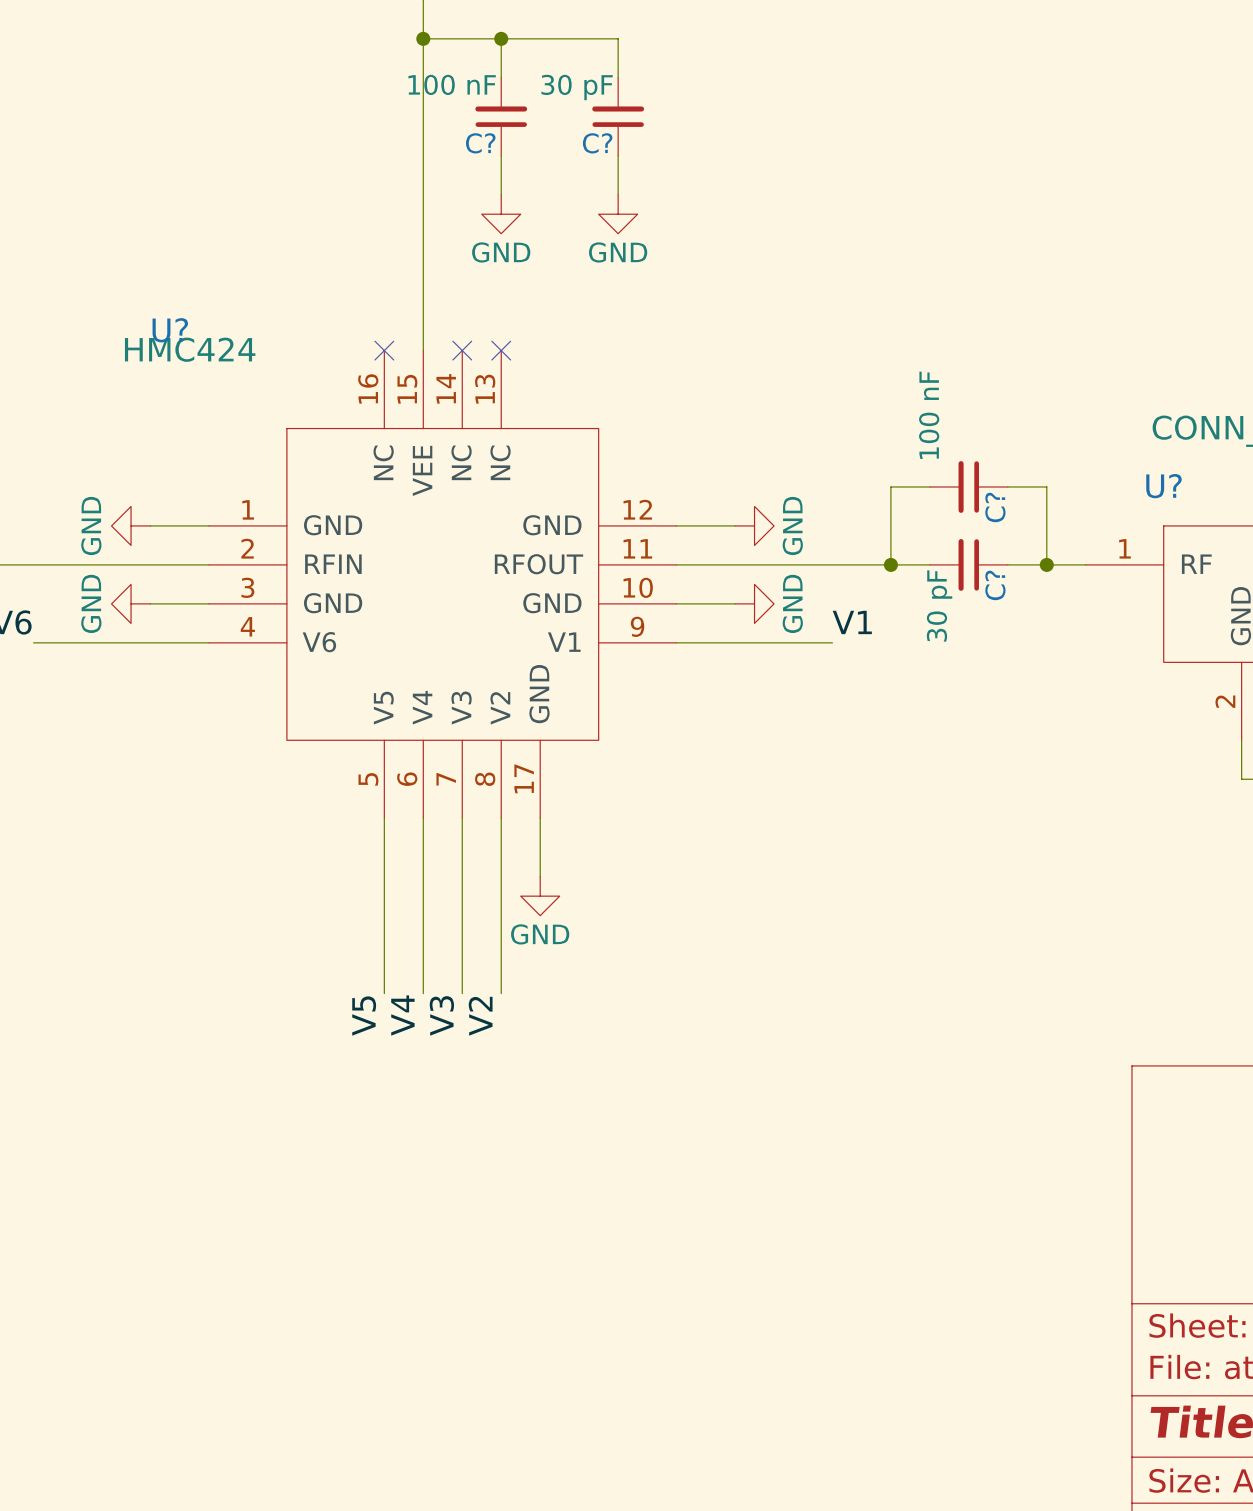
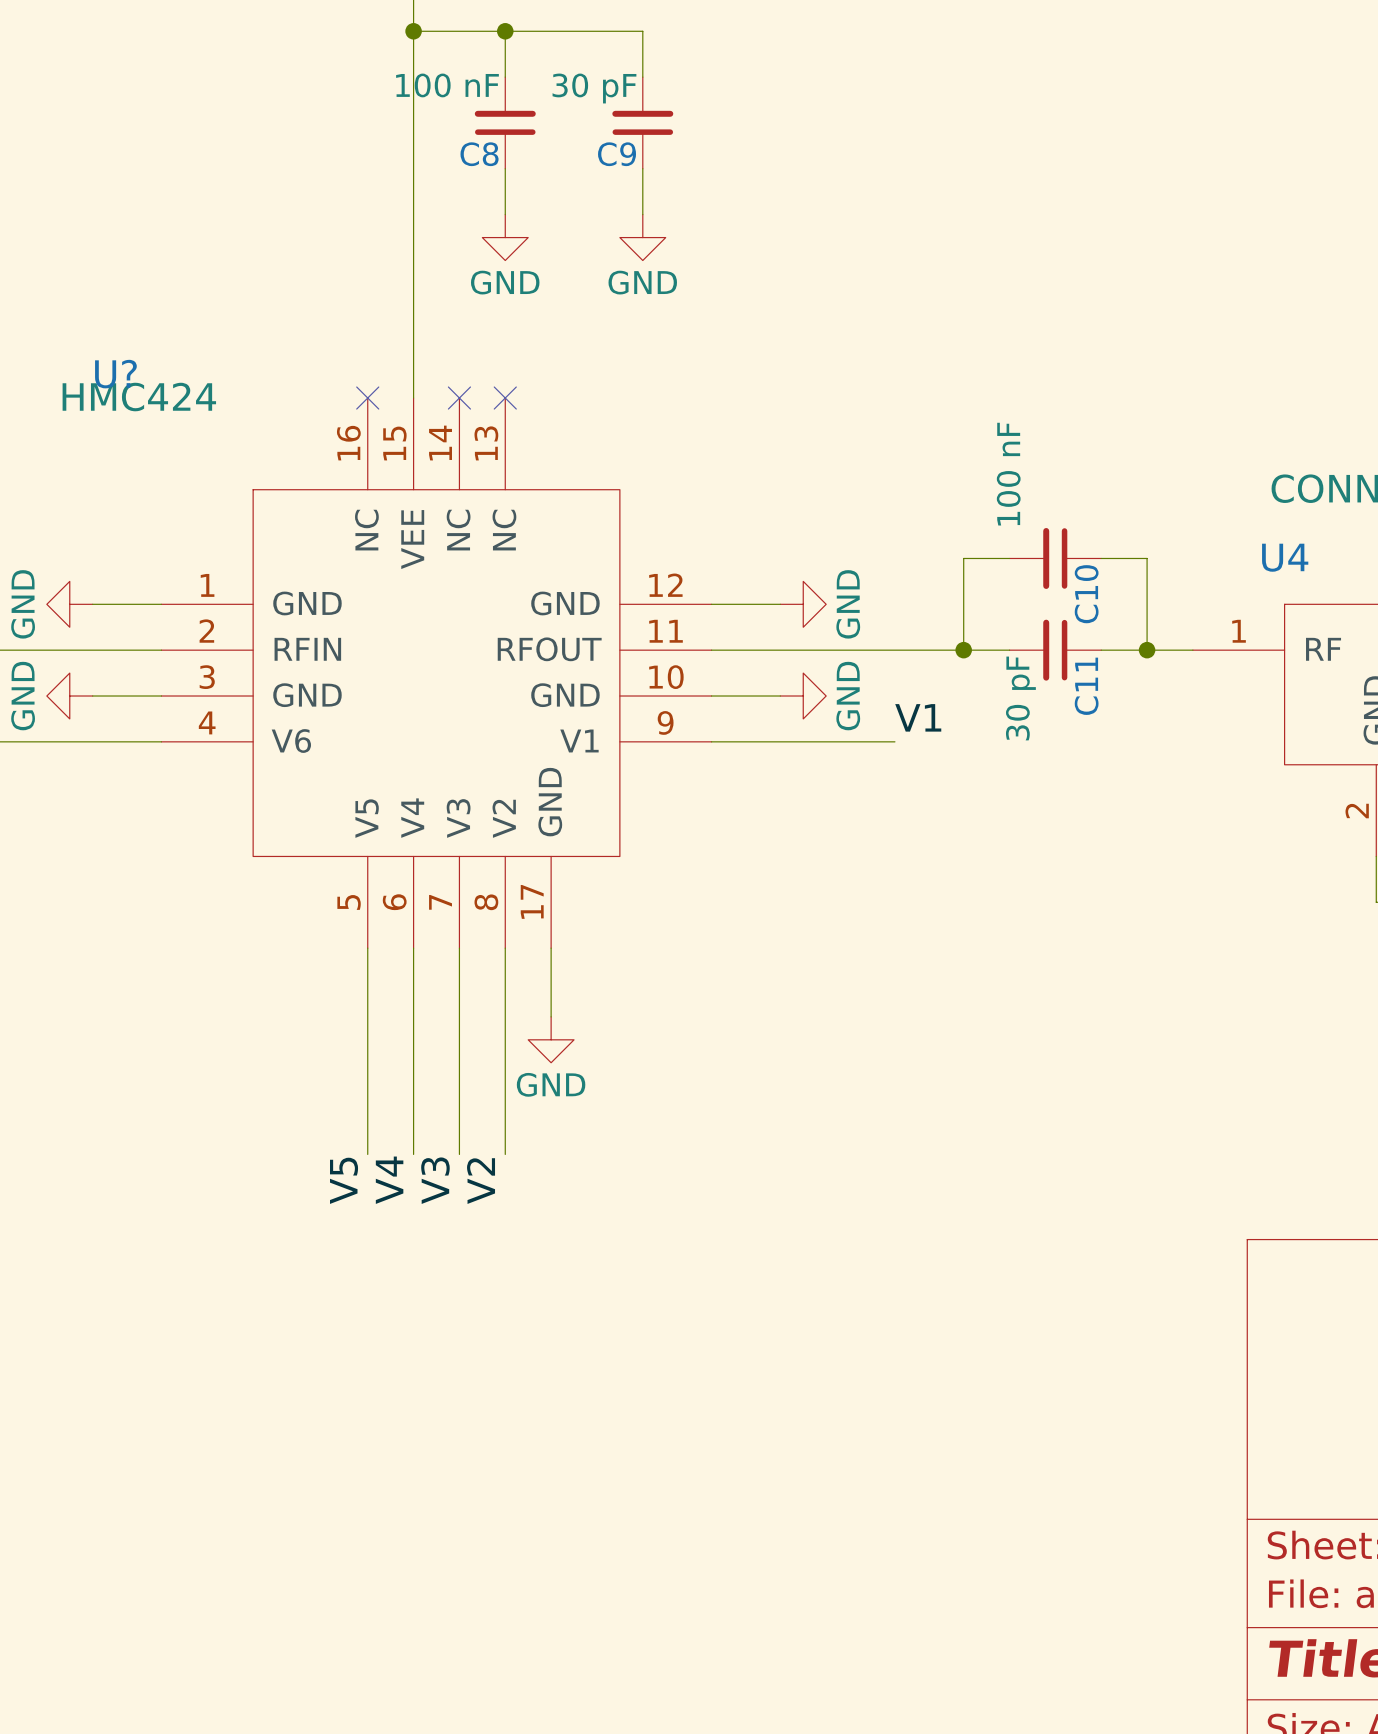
C? name: C? (480, 143) -> C8 (479, 154)
C? name: C? (597, 143) -> C9 (617, 154)
U? name: U? (1163, 486) -> U4 (1285, 557)
C? name: C? (995, 507) -> C10 (1086, 594)
C? name: C? (995, 585) -> C11 (1086, 686)

